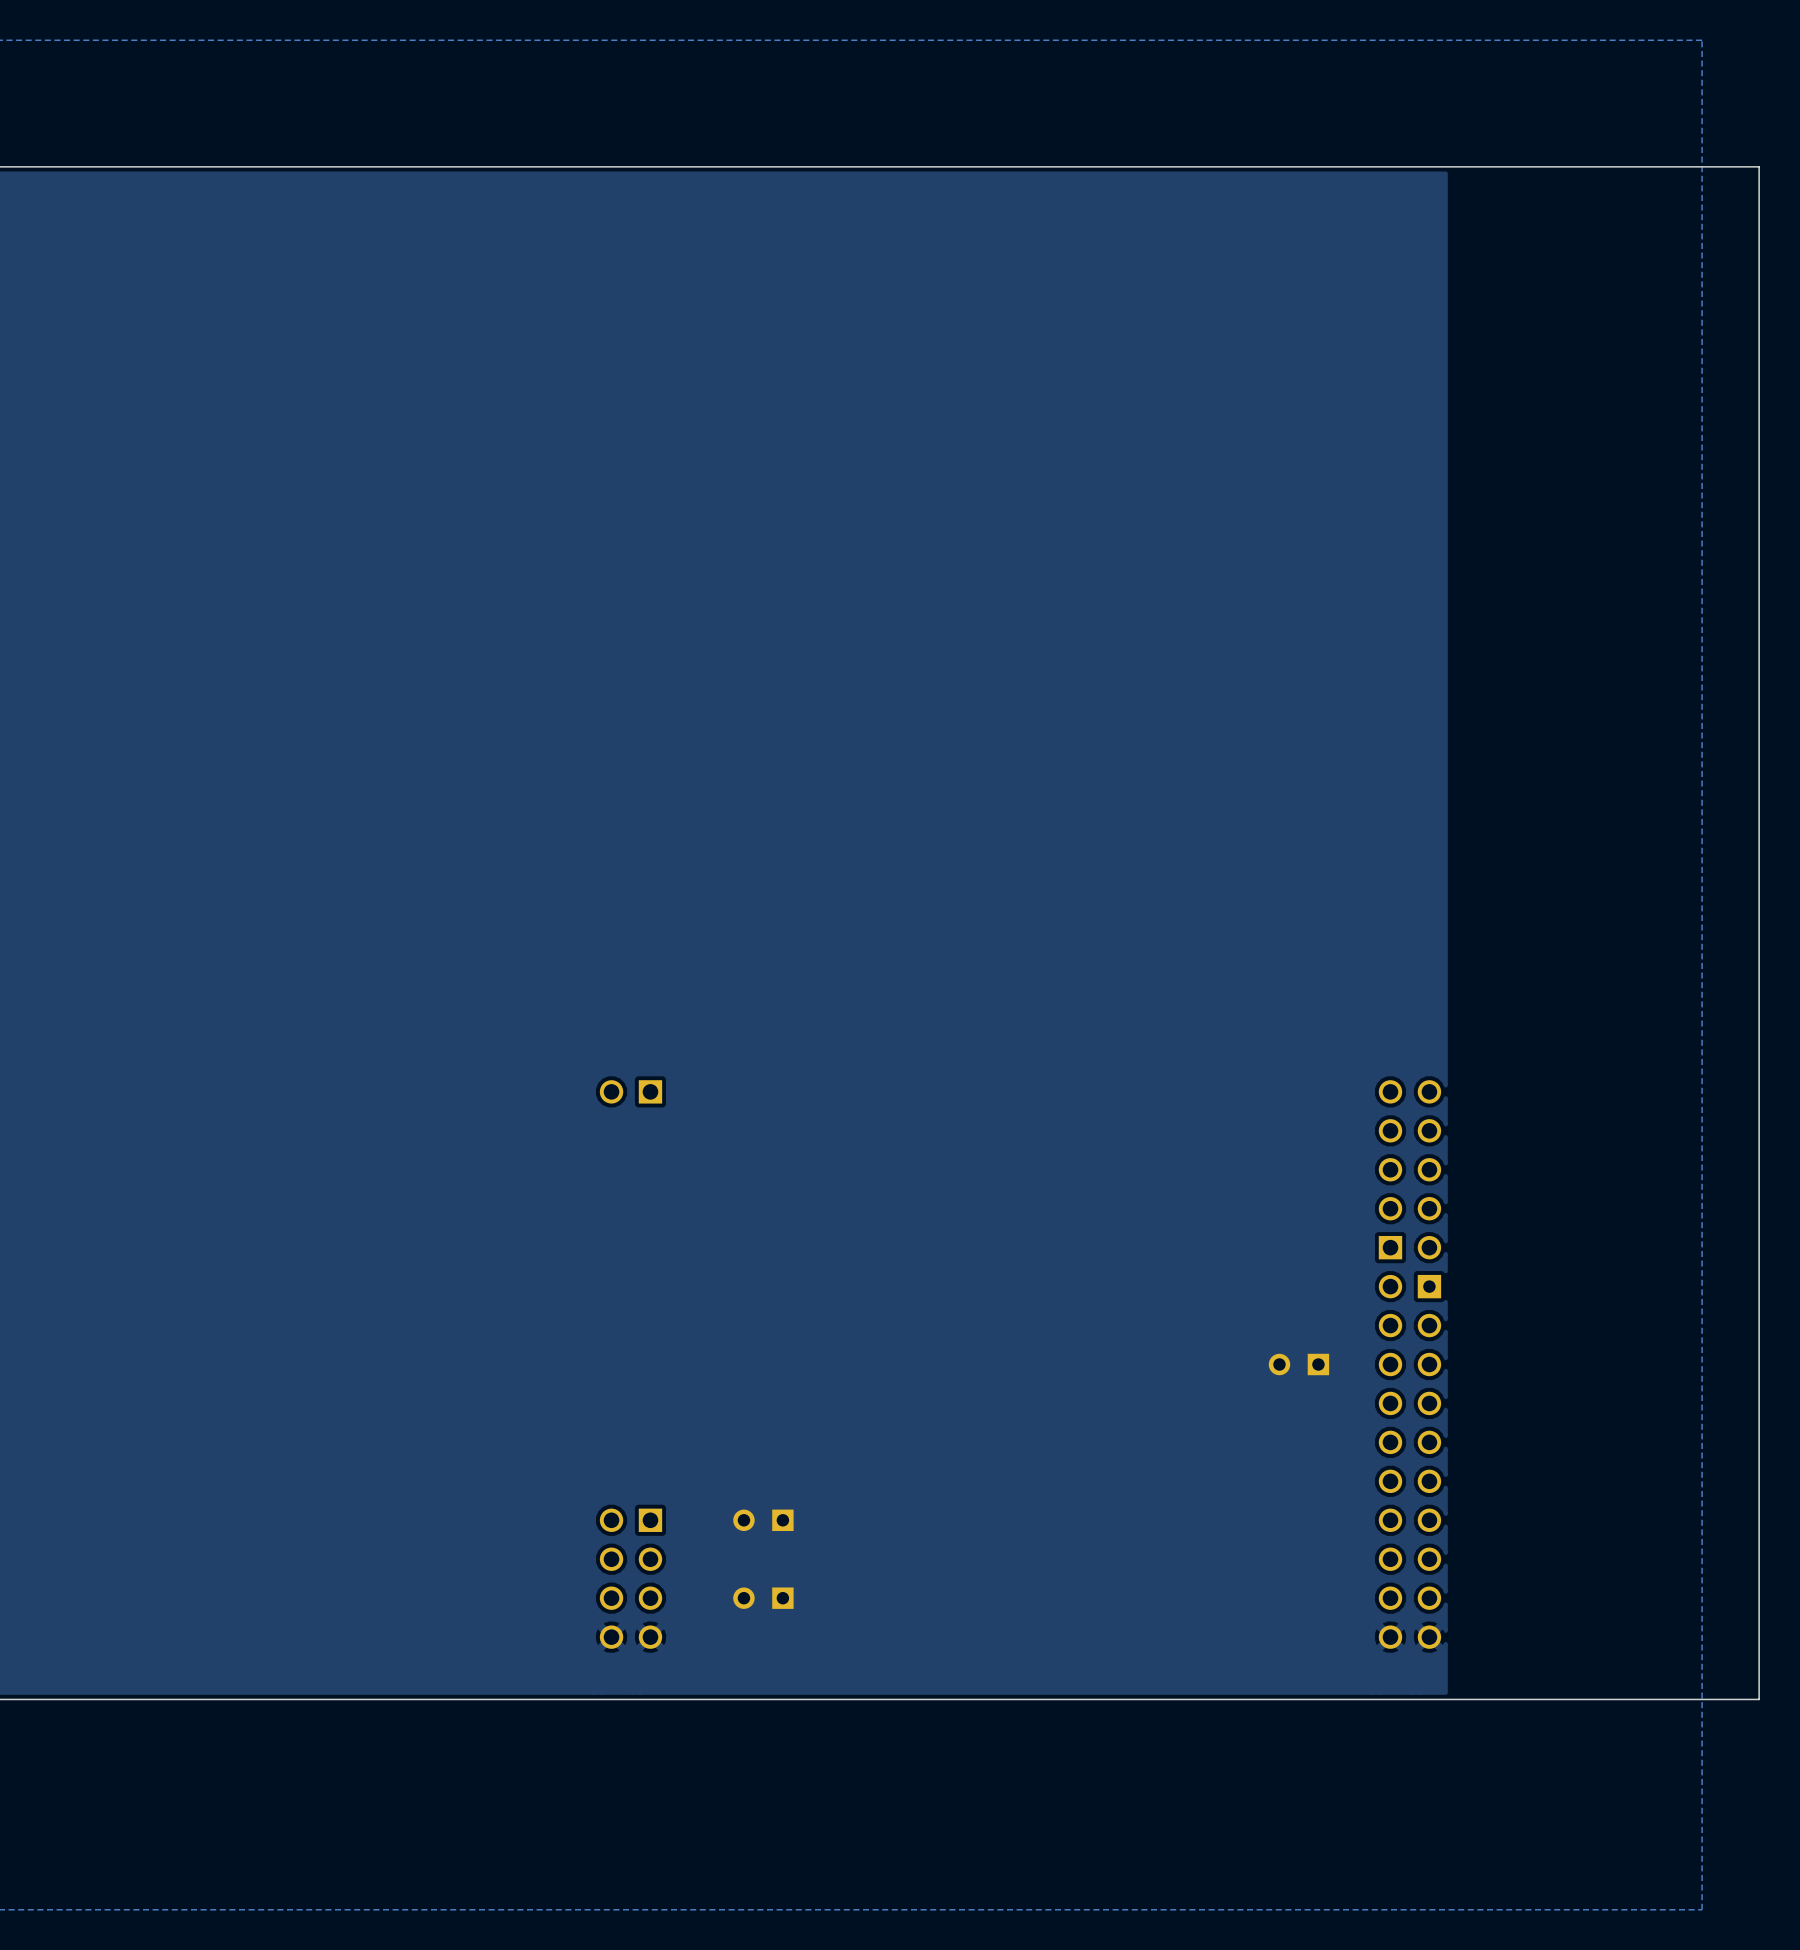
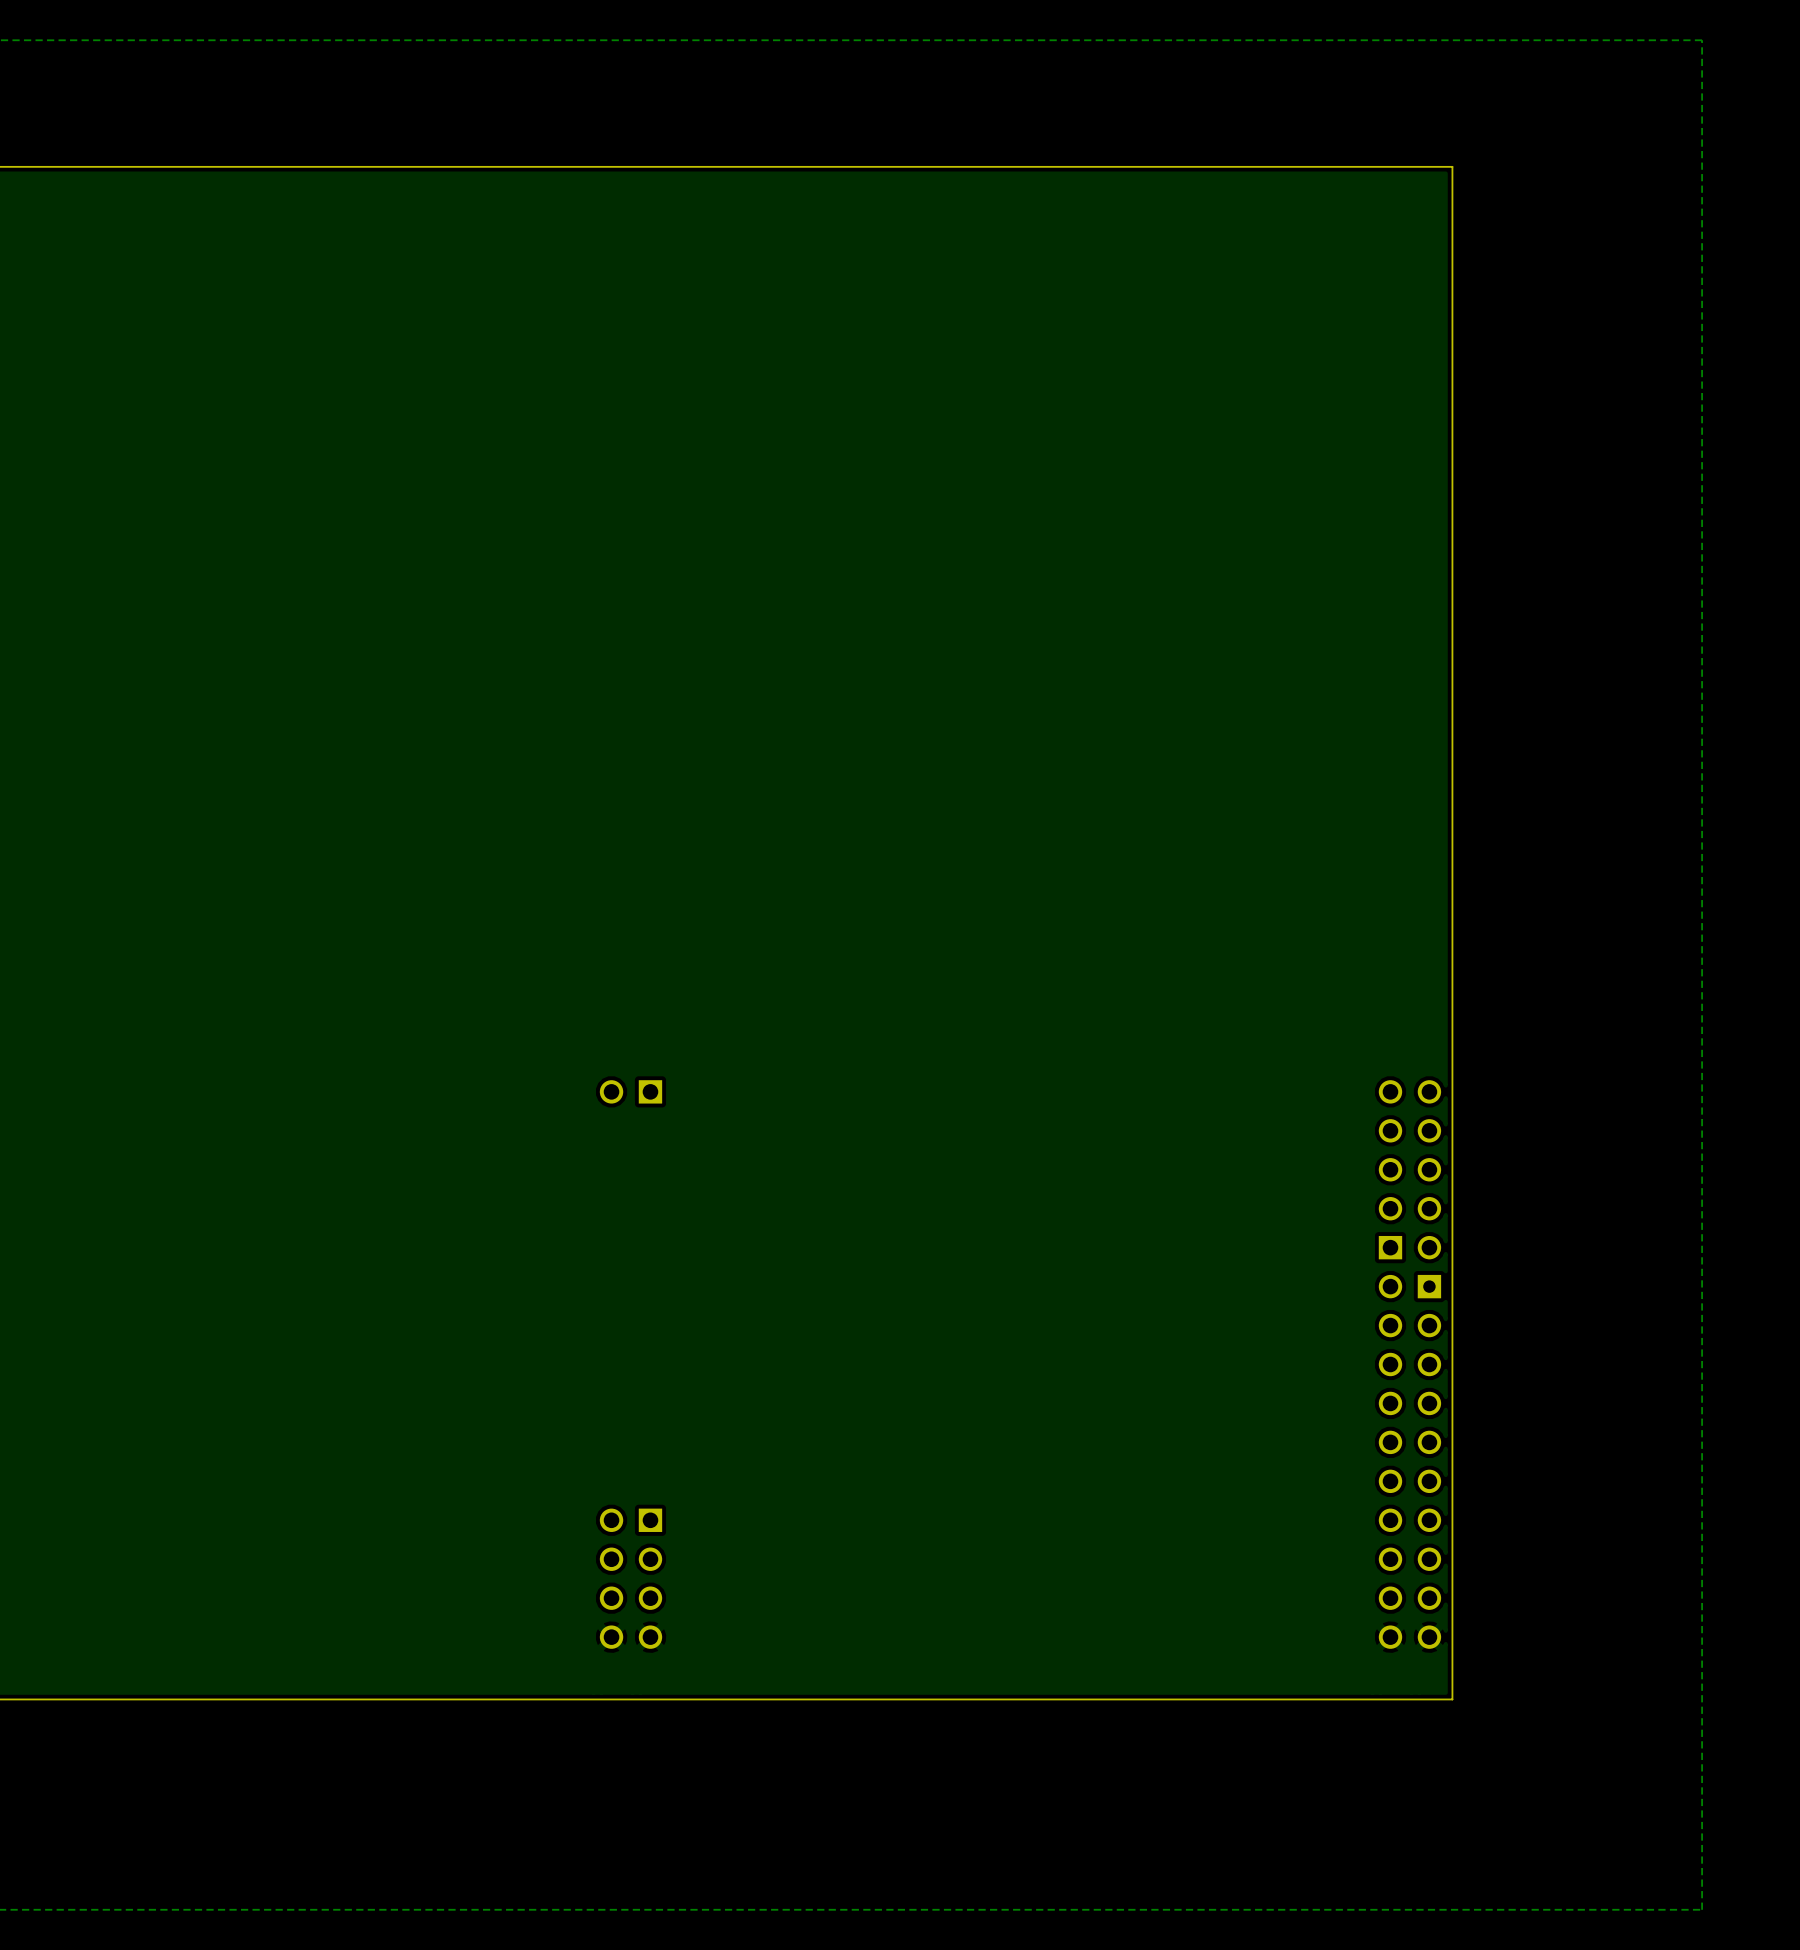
board edge: (1452, 166) (1759, 166) (1759, 1699) (1452, 1699) -> (1452, 166) (1452, 1699)
part: (1298, 1364) -> none
part: (763, 1520) -> none
part: (763, 1598) -> none

